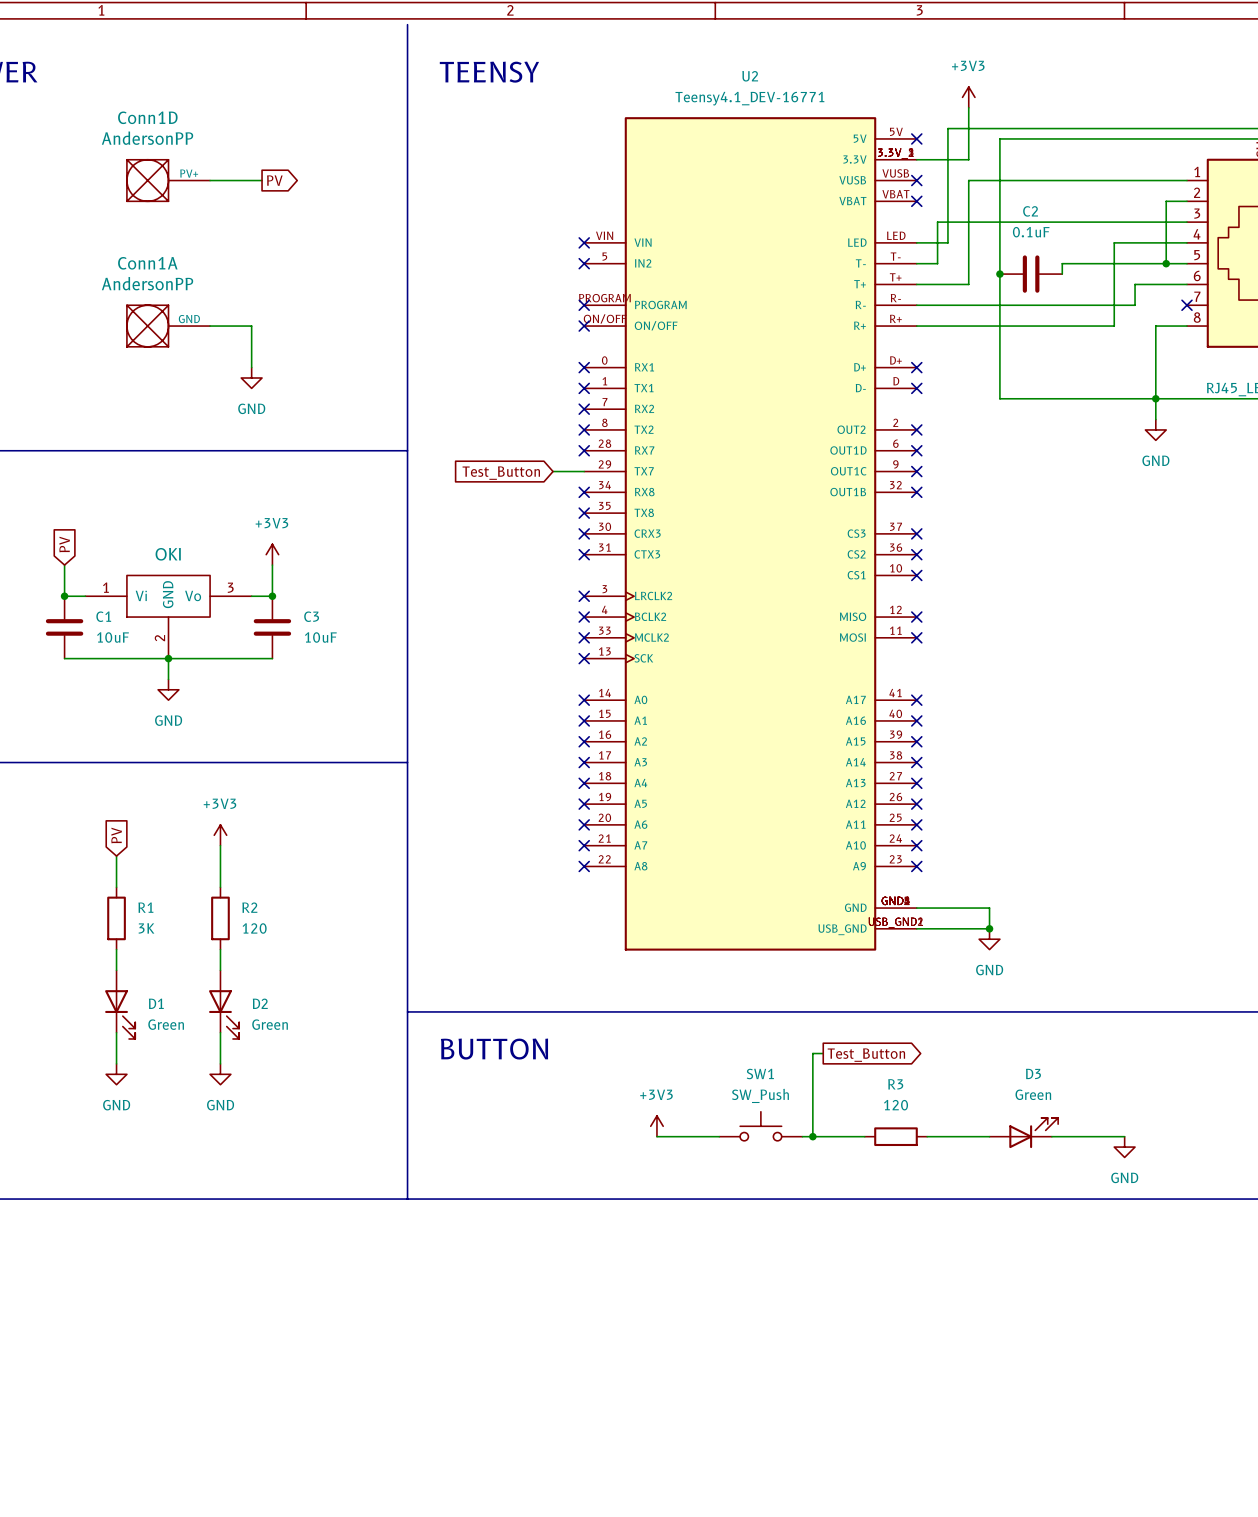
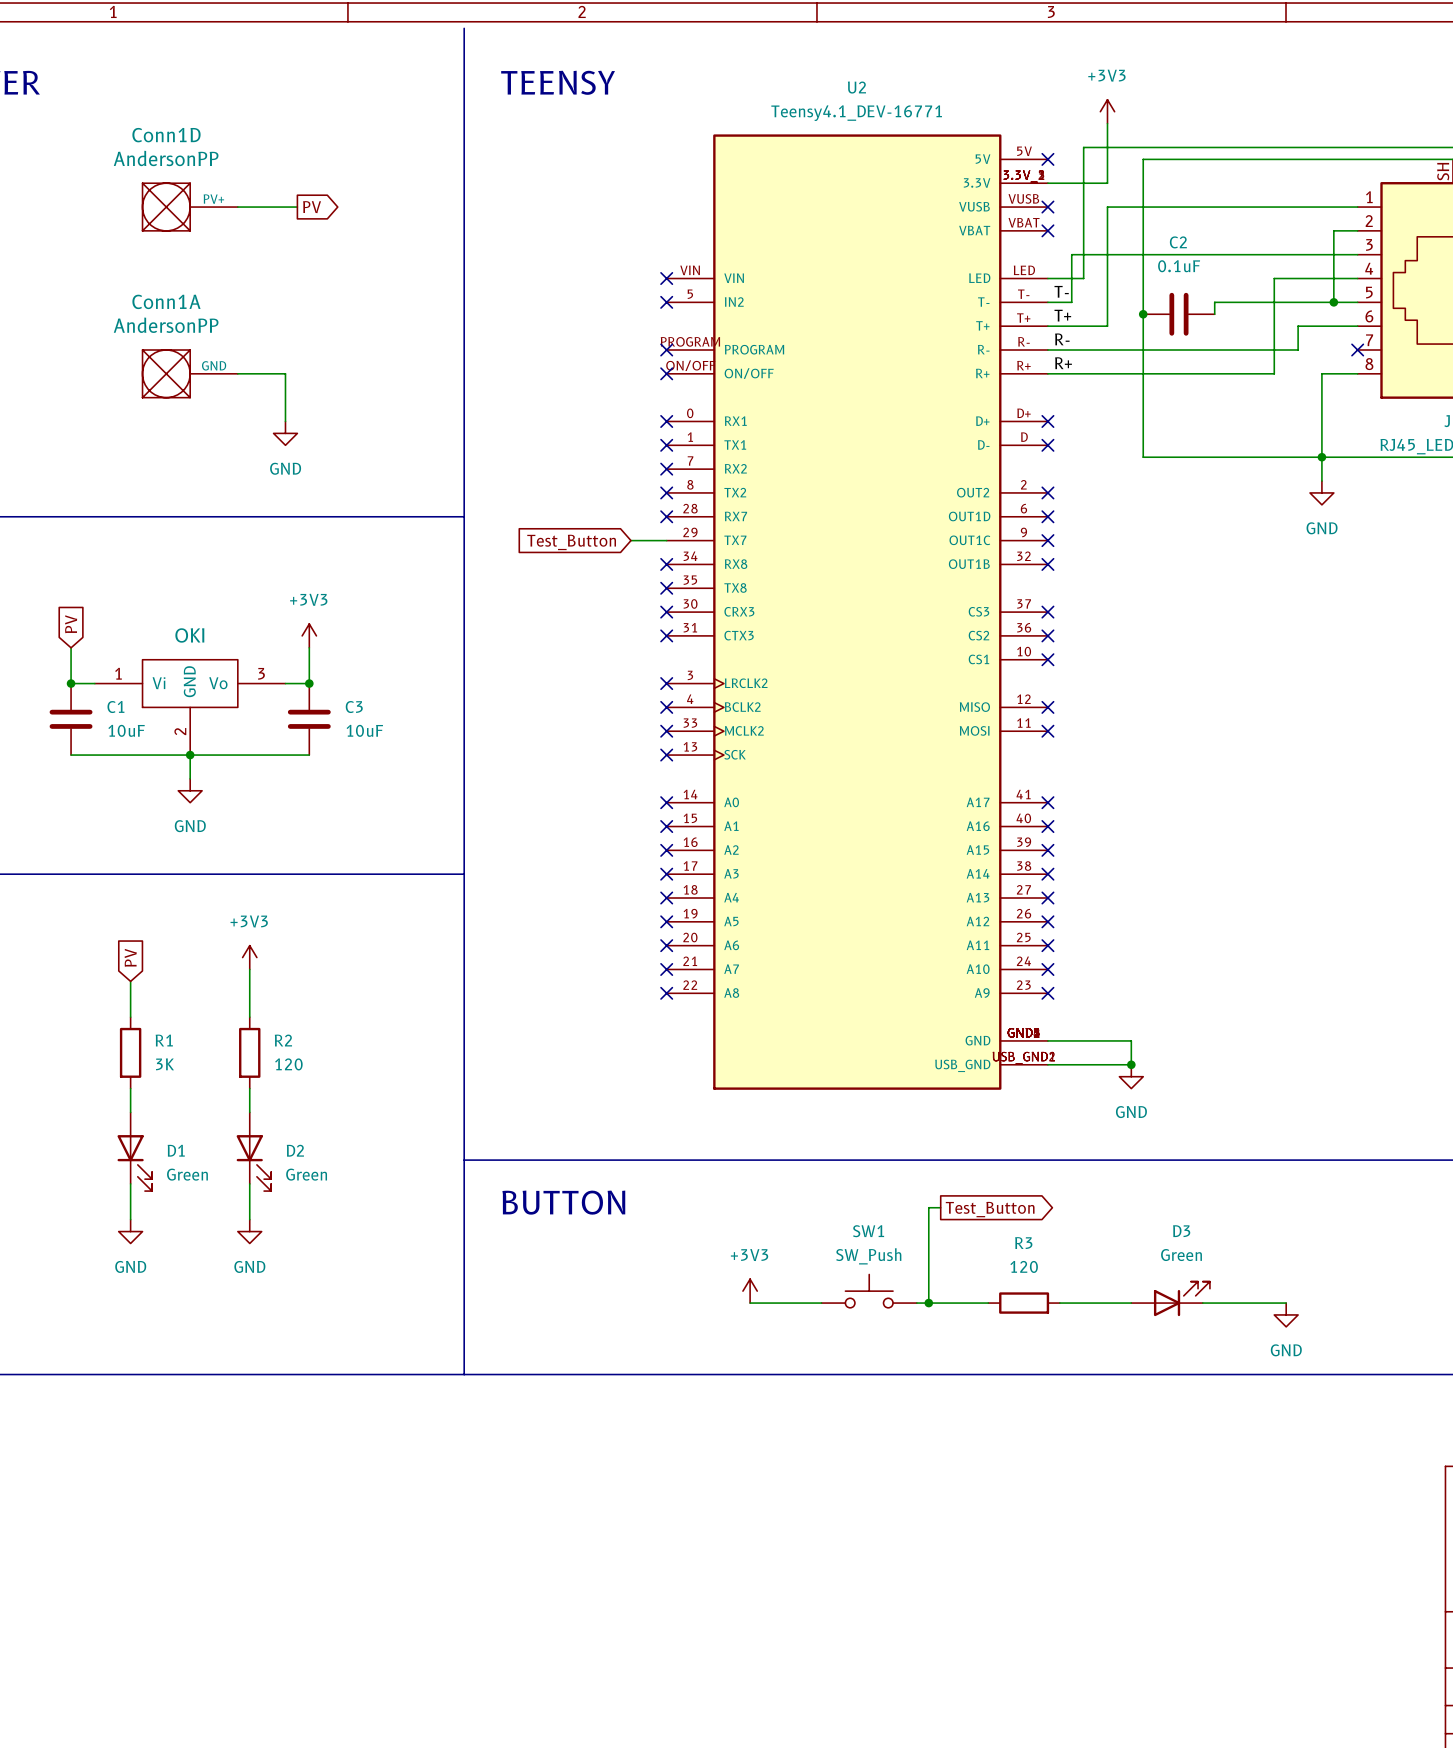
label: none -> T- (1061, 291)
label: none -> T+ (1062, 315)
label: none -> R- (1062, 339)
label: none -> R+ (1063, 363)

